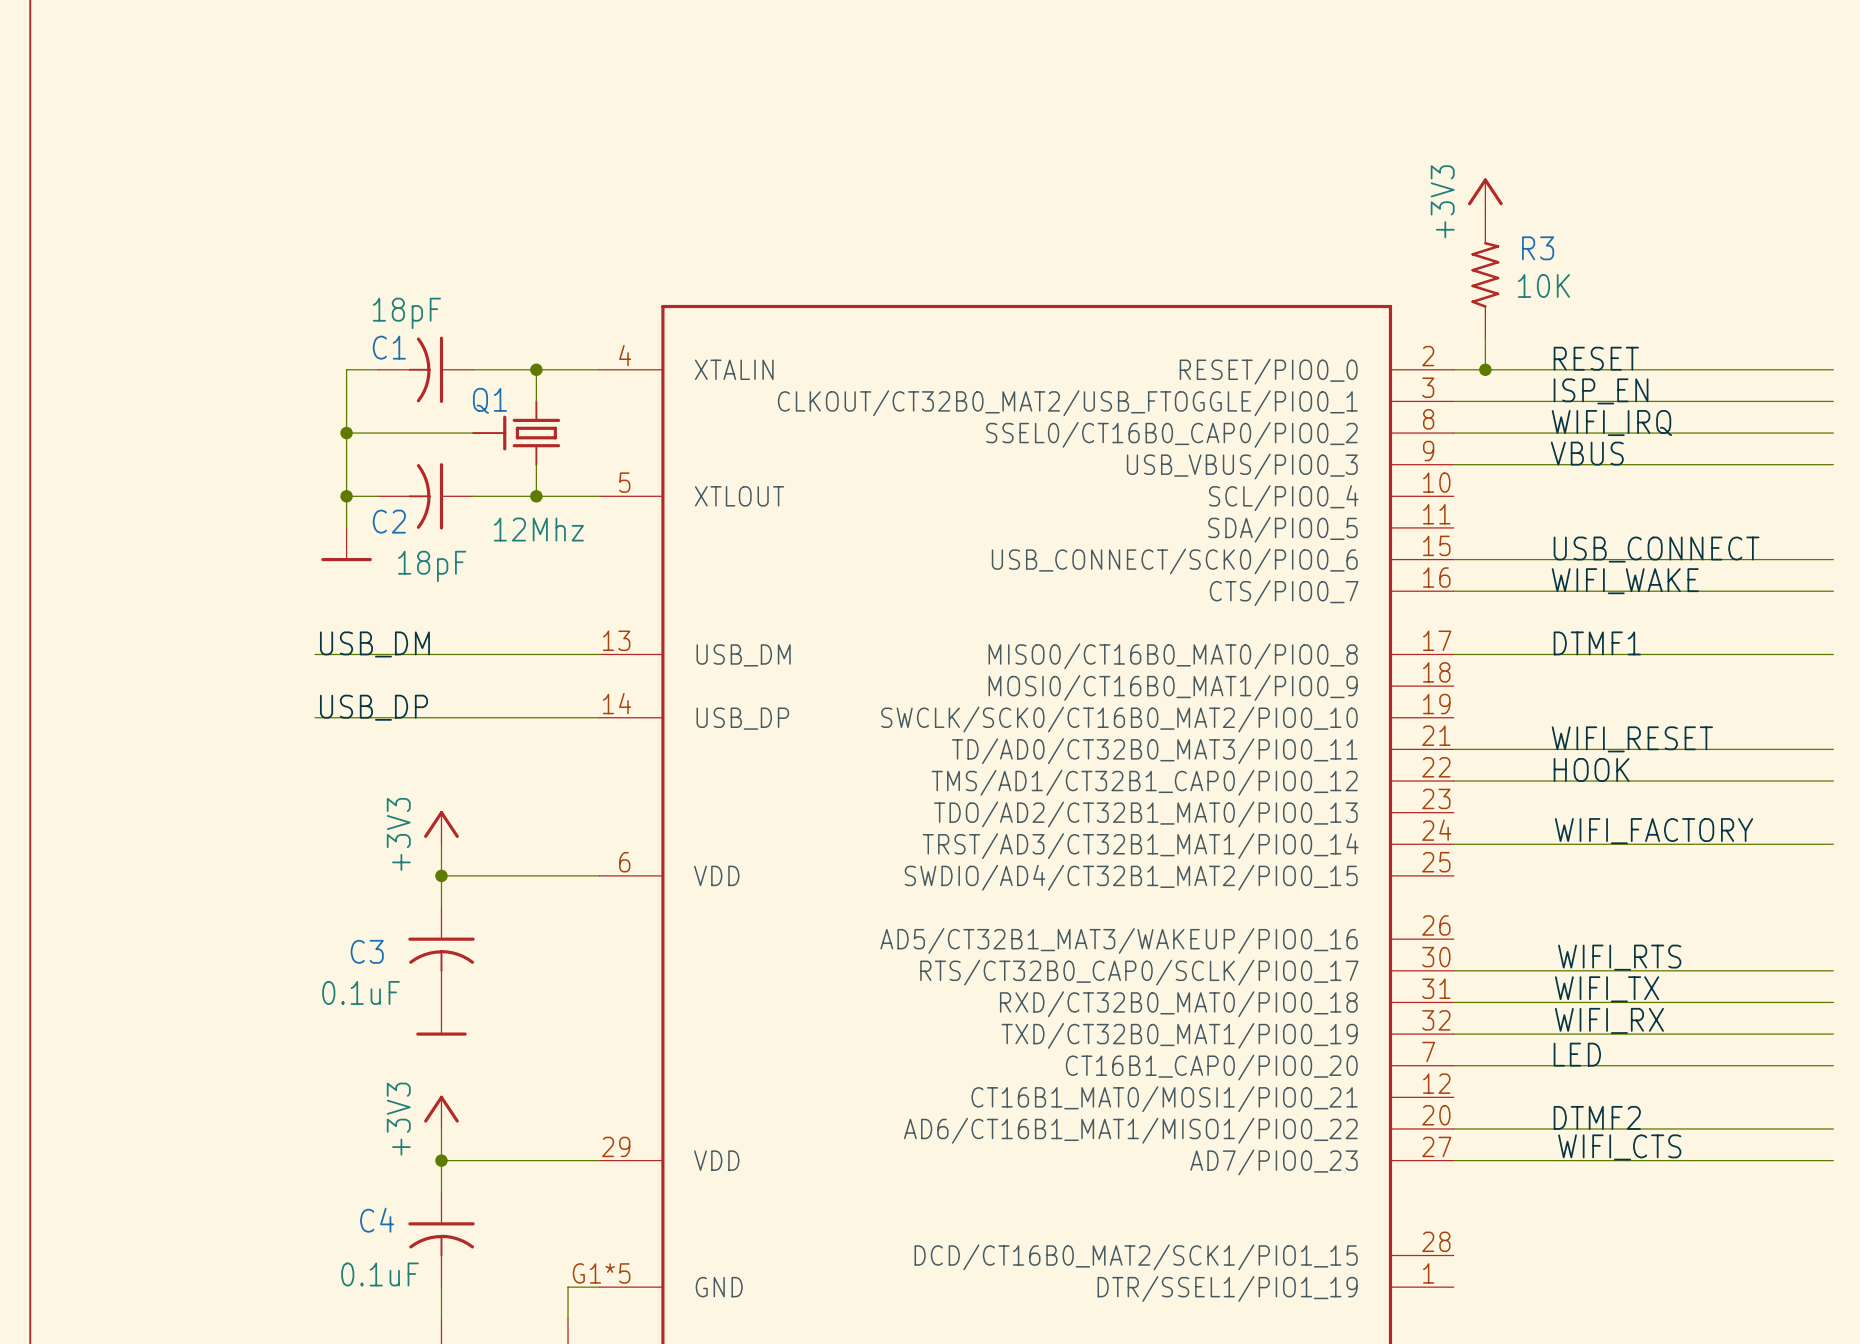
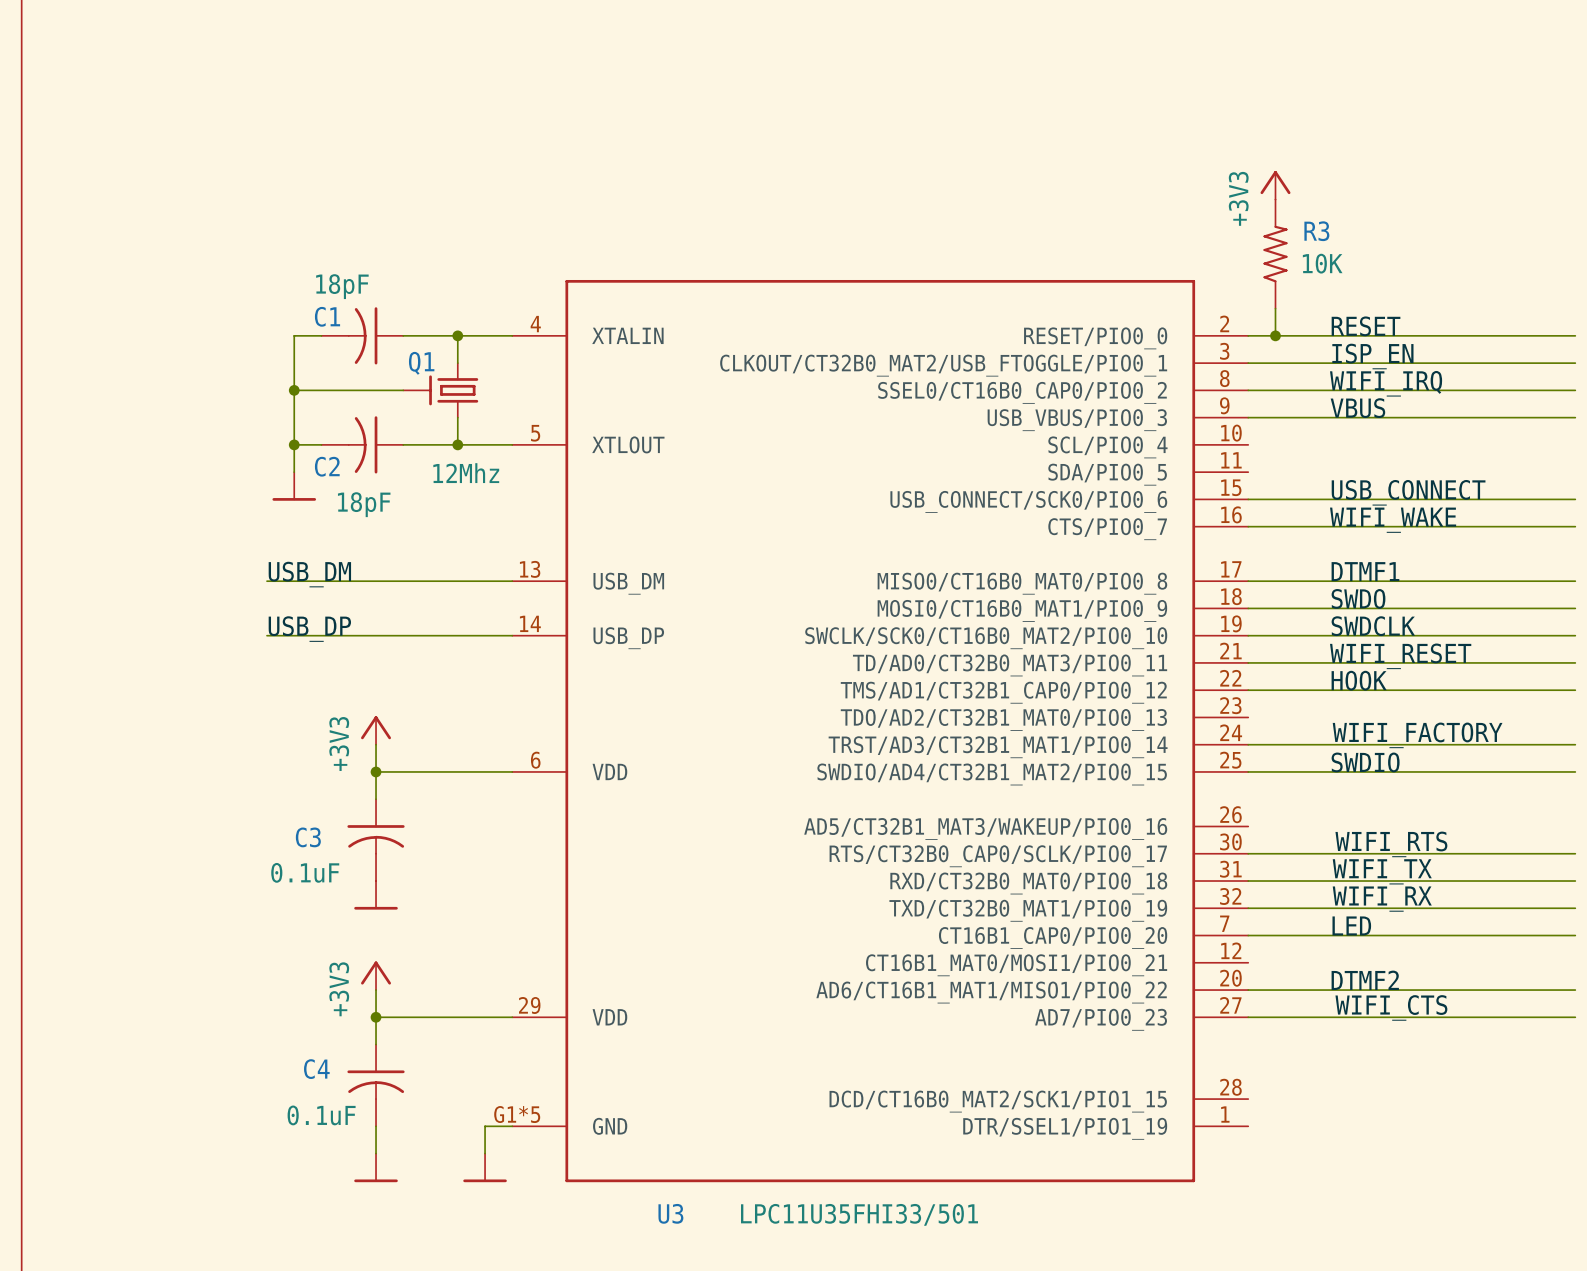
label: none -> SWDO (1358, 598)
wire: none -> (1248, 608) (1575, 608)
label: none -> SWDCLK (1373, 626)
wire: none -> (1248, 635) (1575, 635)
label: none -> SWDIO (1365, 762)
wire: none -> (1248, 771) (1575, 771)

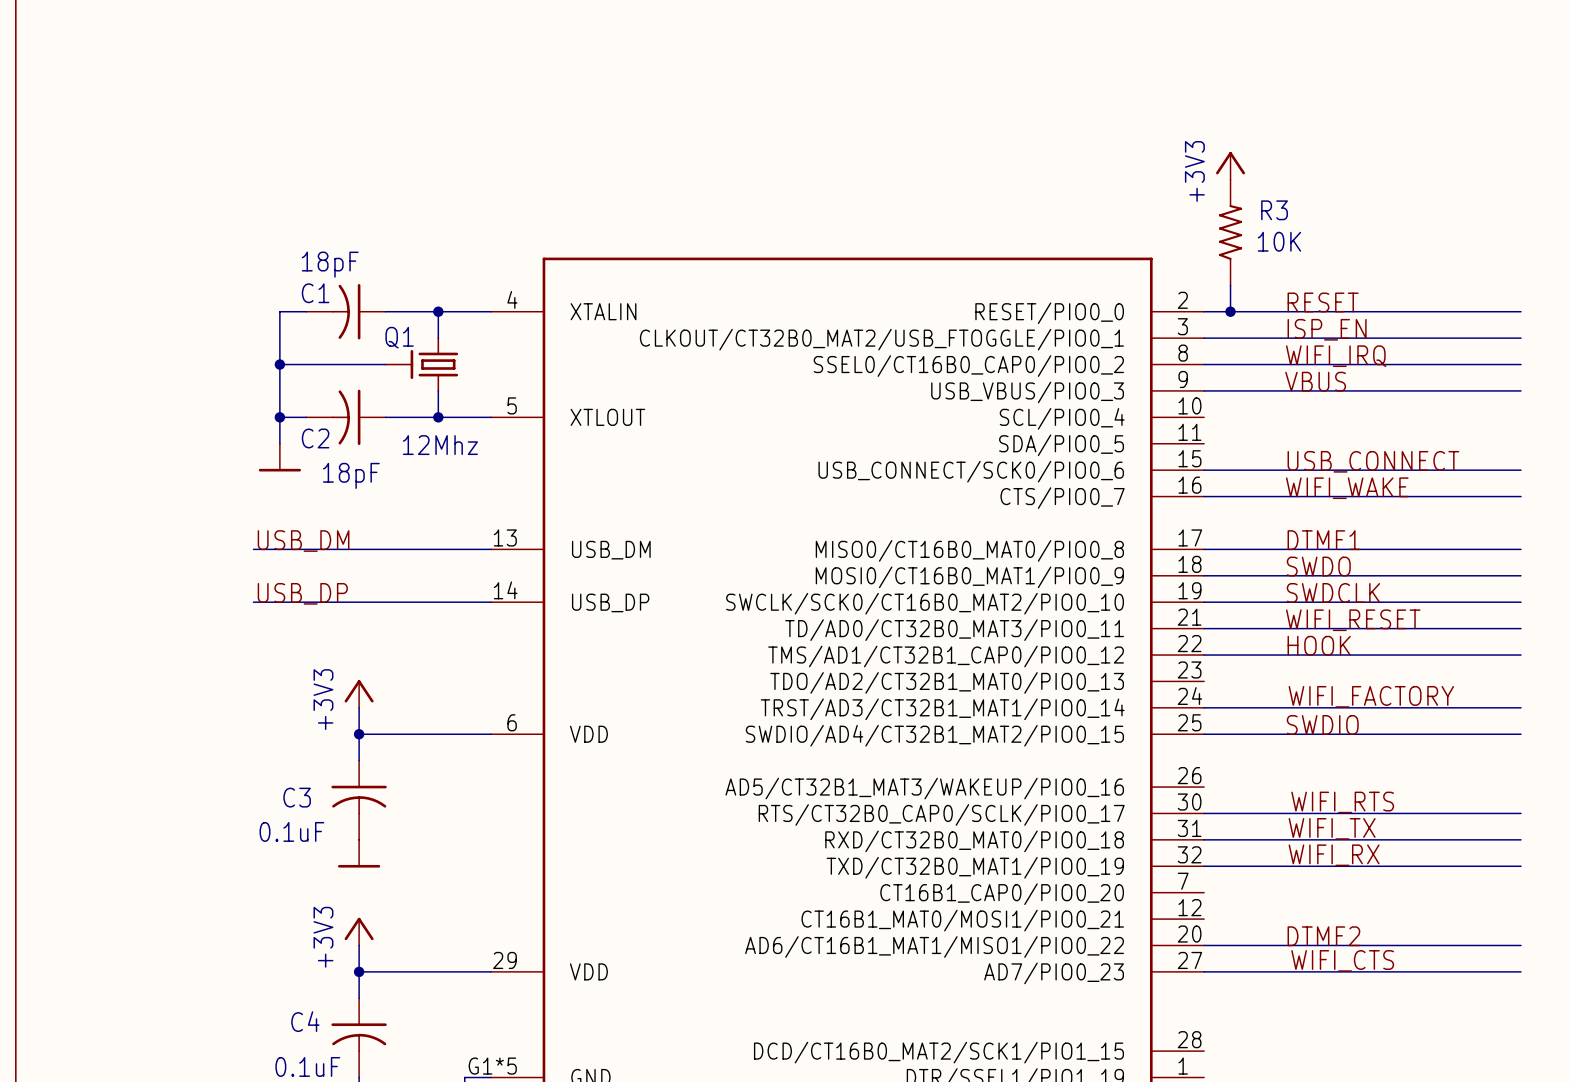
label: LED (1351, 925) -> none
wire: (1248, 935) (1575, 935) -> none

